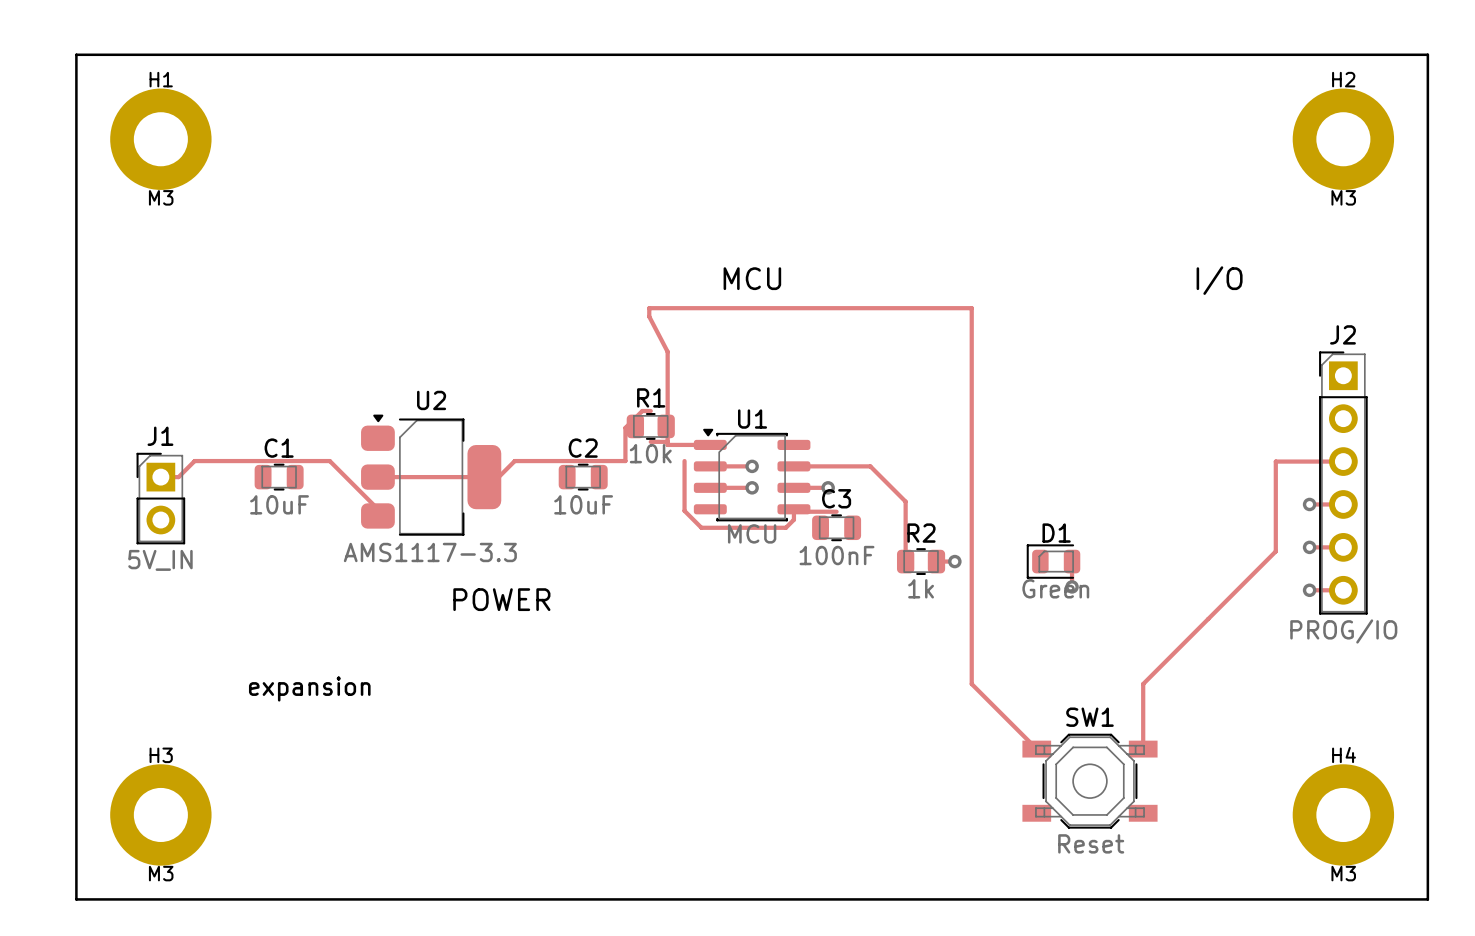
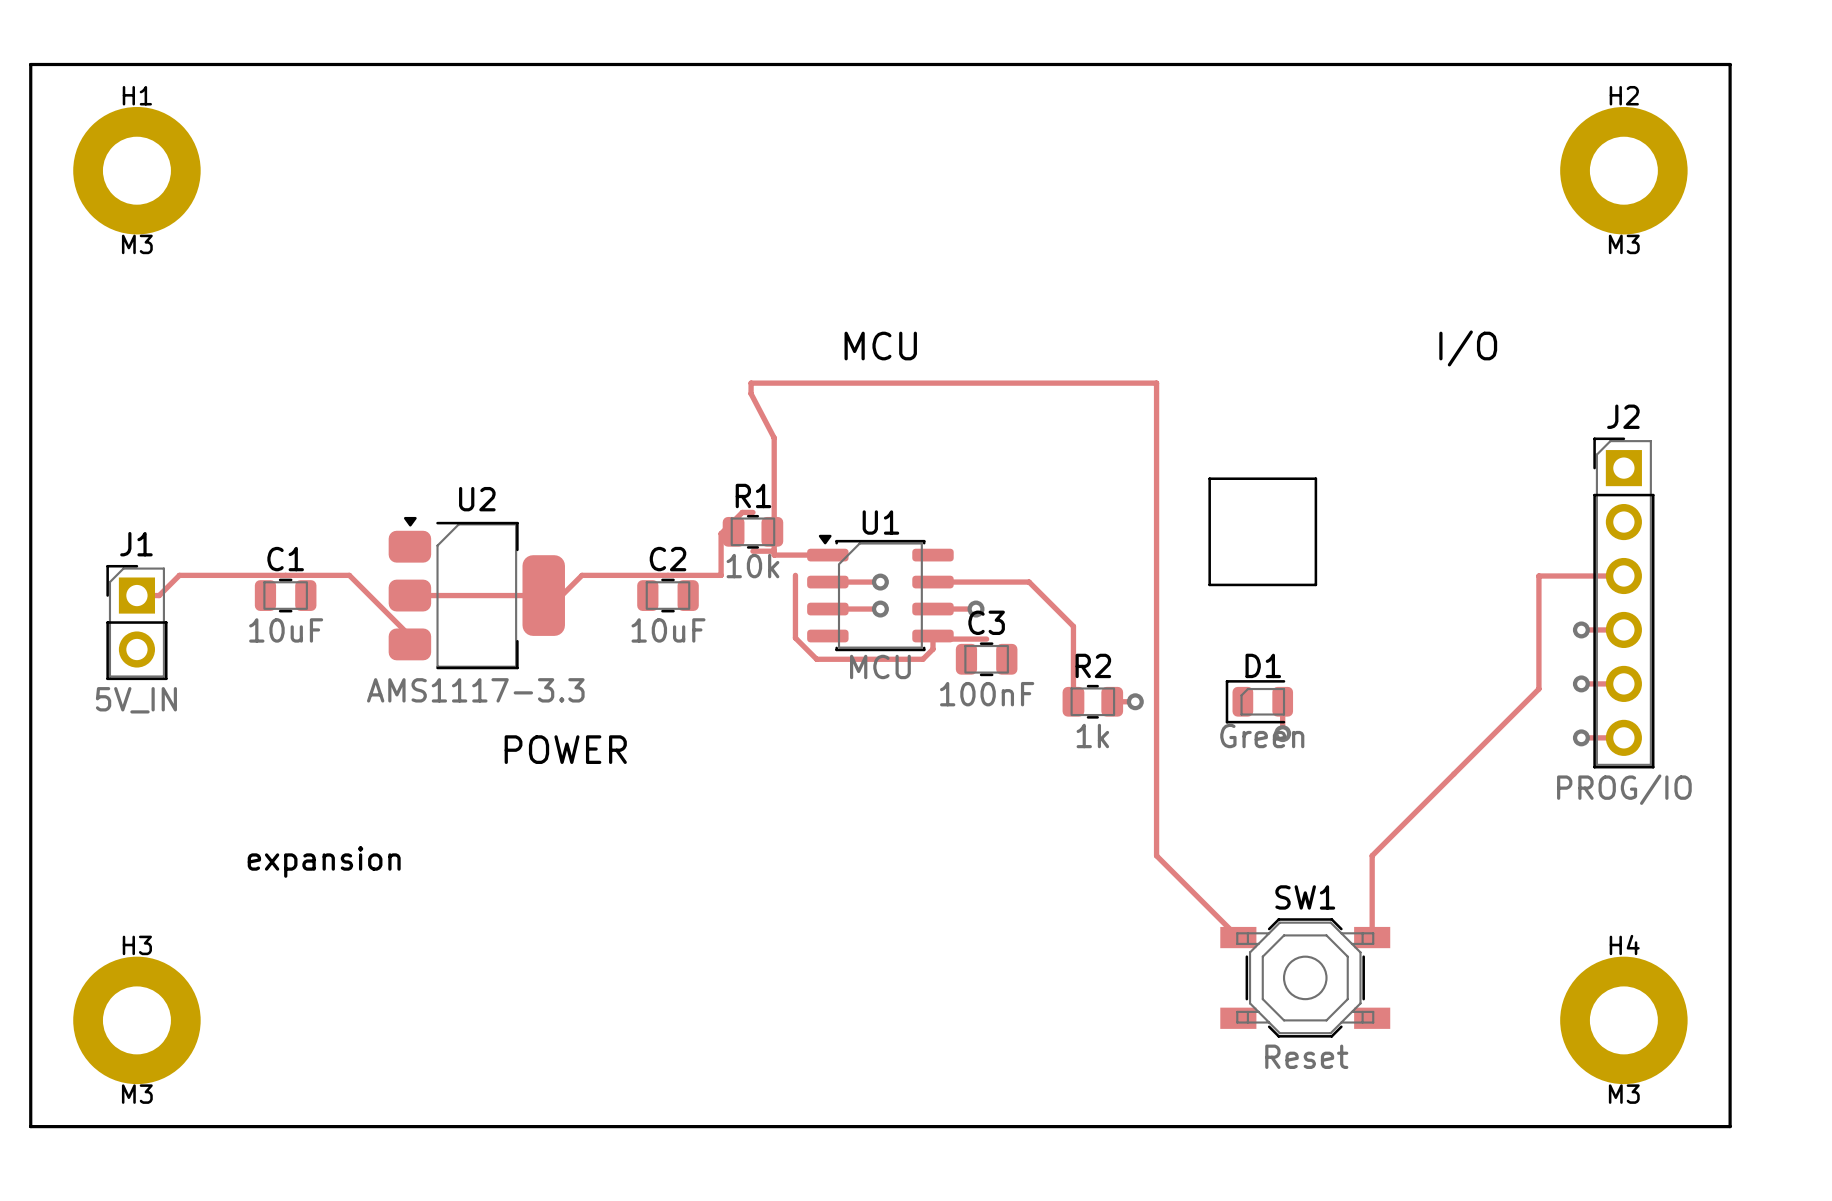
line: none -> (1209, 478) (1315, 478) (1315, 584) (1209, 584) (1209, 478)

